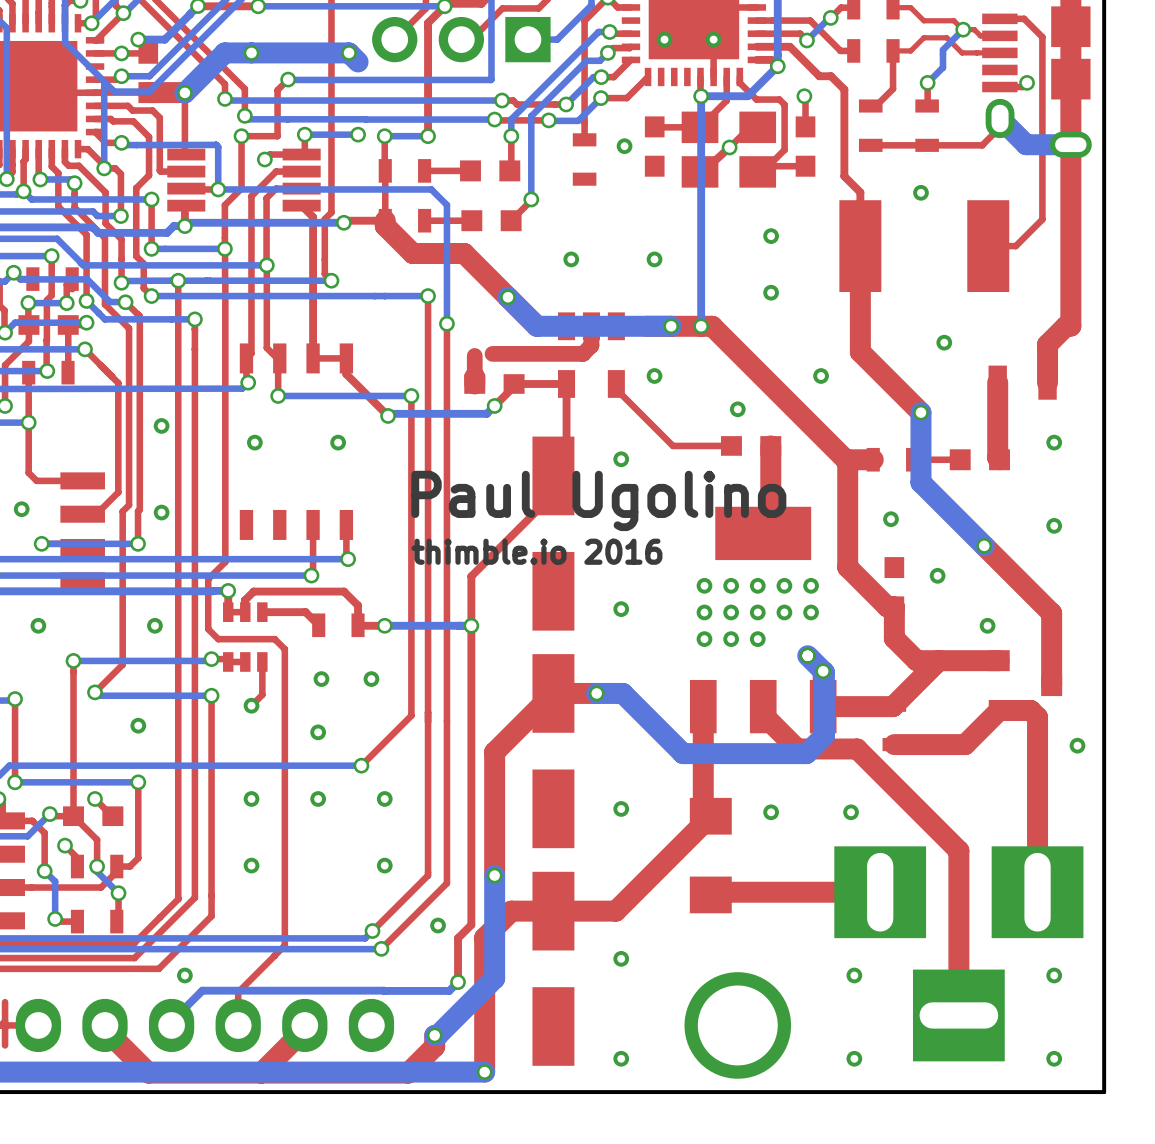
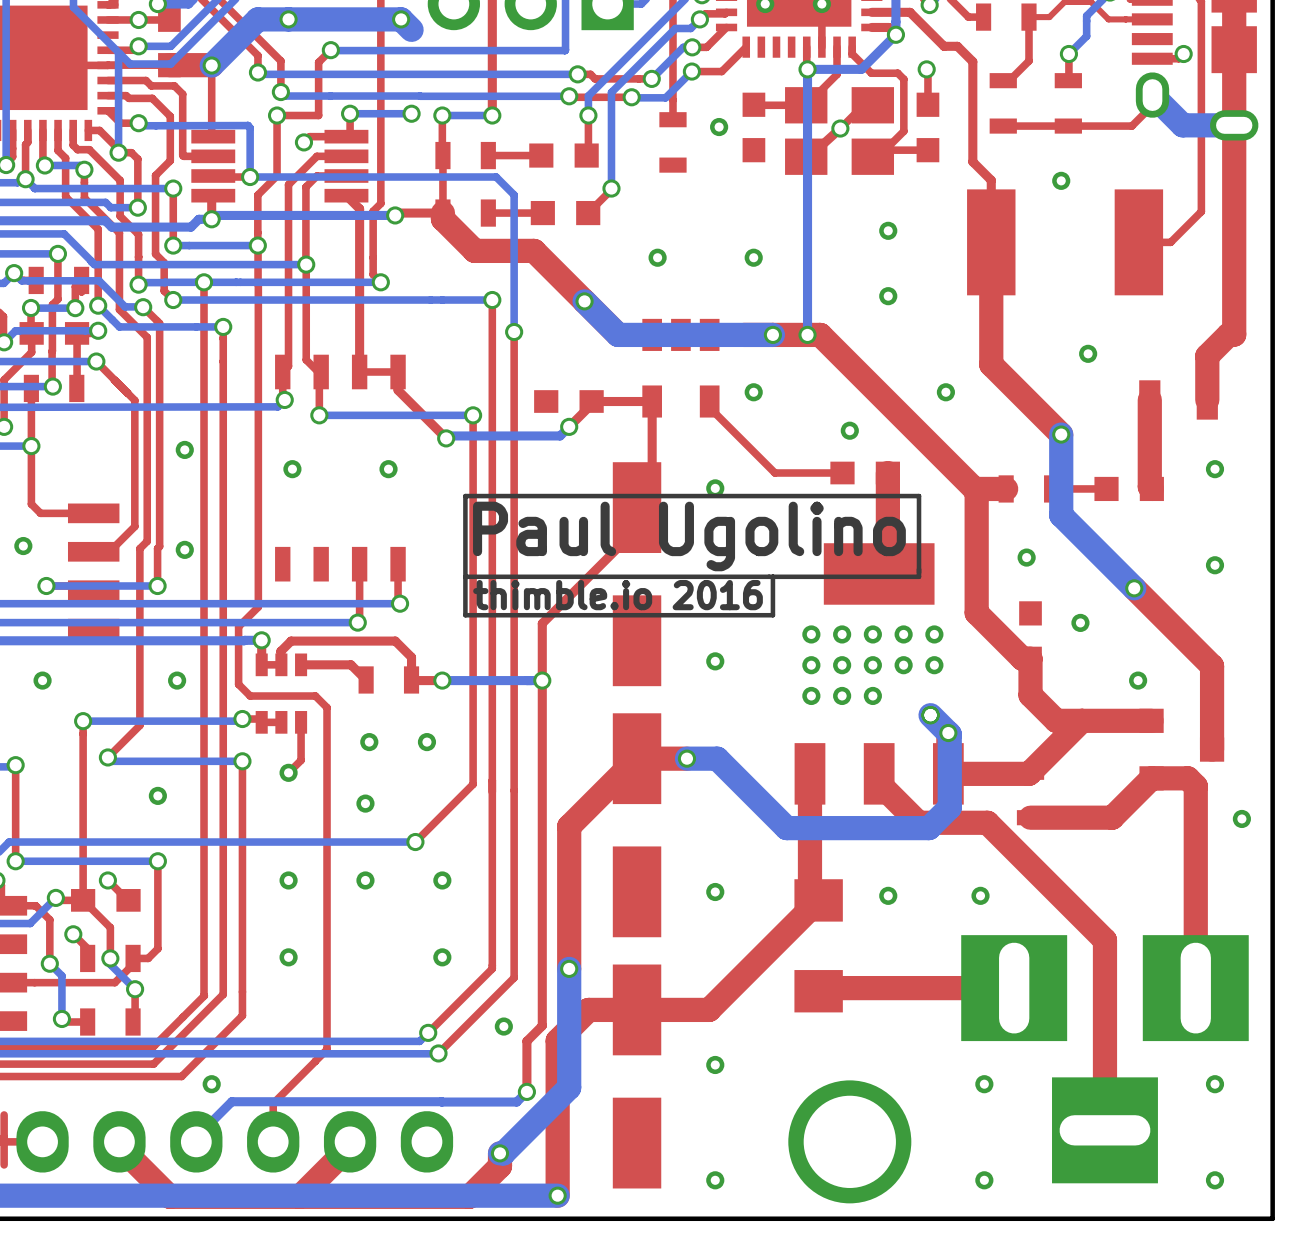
top track: (591, 326) (591, 345) (583, 353) (492, 353) -> none
top track: (474, 355) (474, 383) (474, 377) -> none
line: none -> (772, 576) (772, 615) (465, 615) (465, 496) (919, 496) (919, 576) (465, 576)

